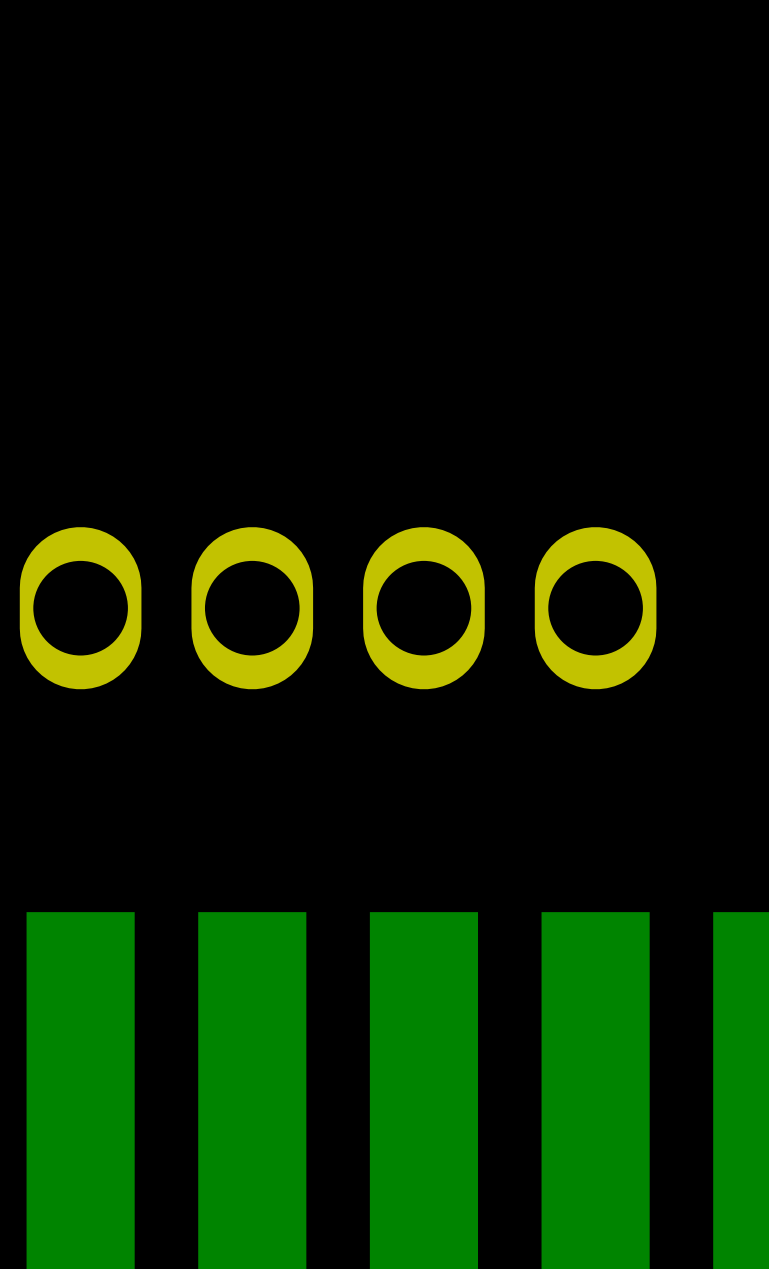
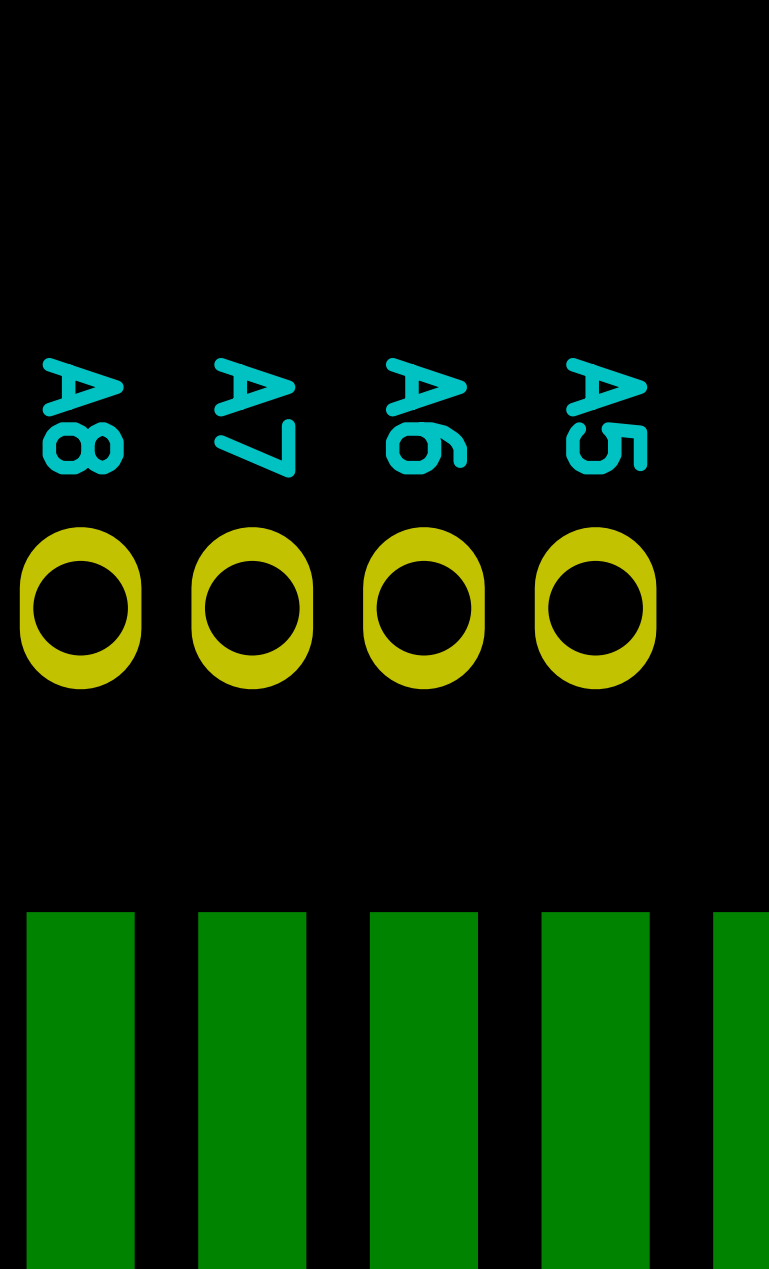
text: none -> A8 (83, 416)
text: none -> A6 (426, 416)
text: none -> A5 (606, 416)
text: none -> A7 (254, 417)

